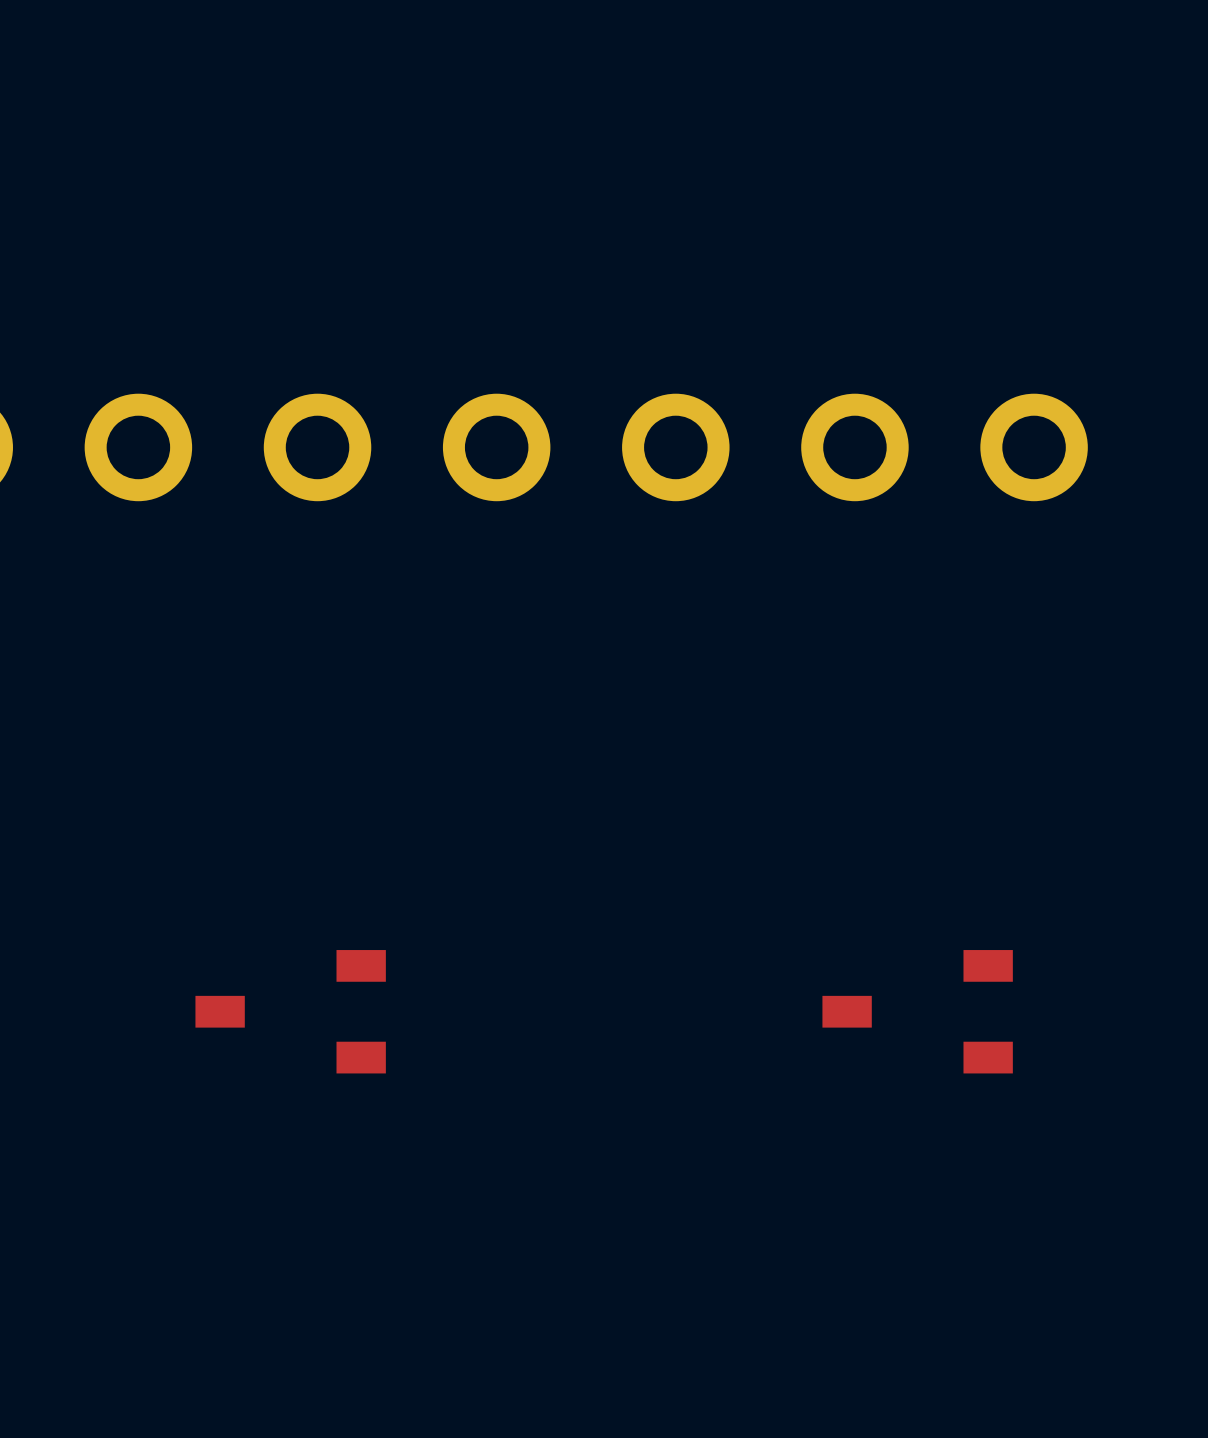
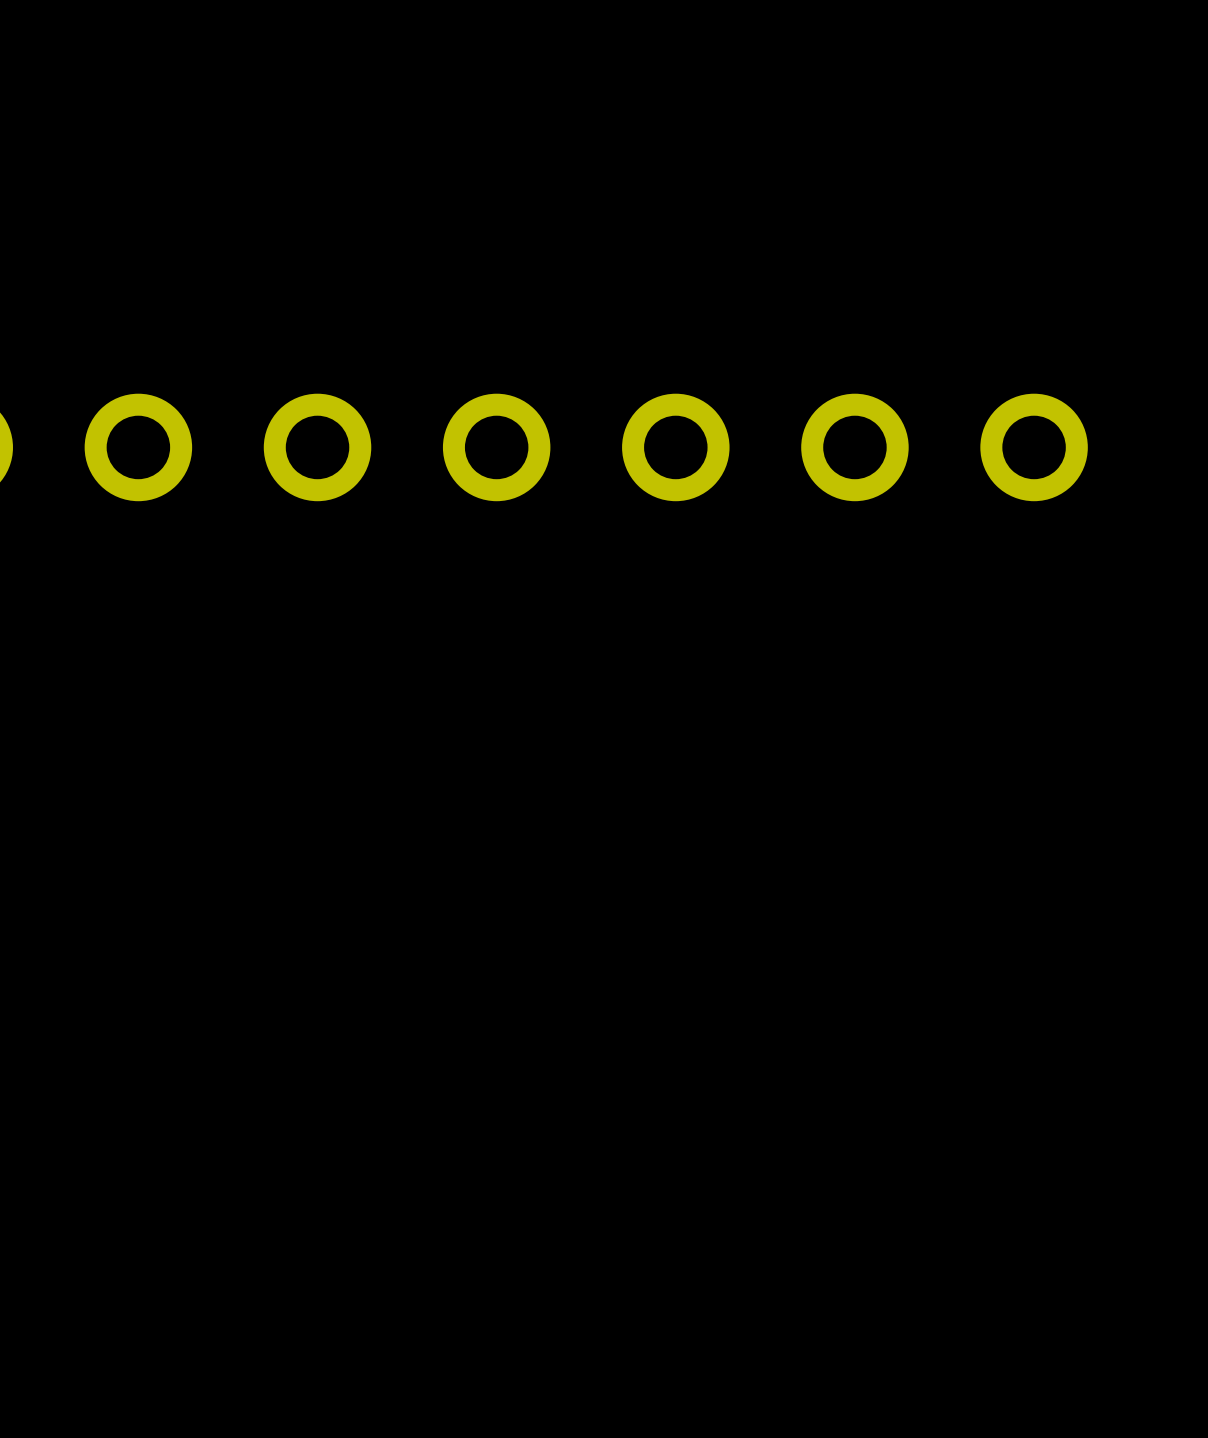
part: (290, 1011) -> none
part: (917, 1011) -> none

